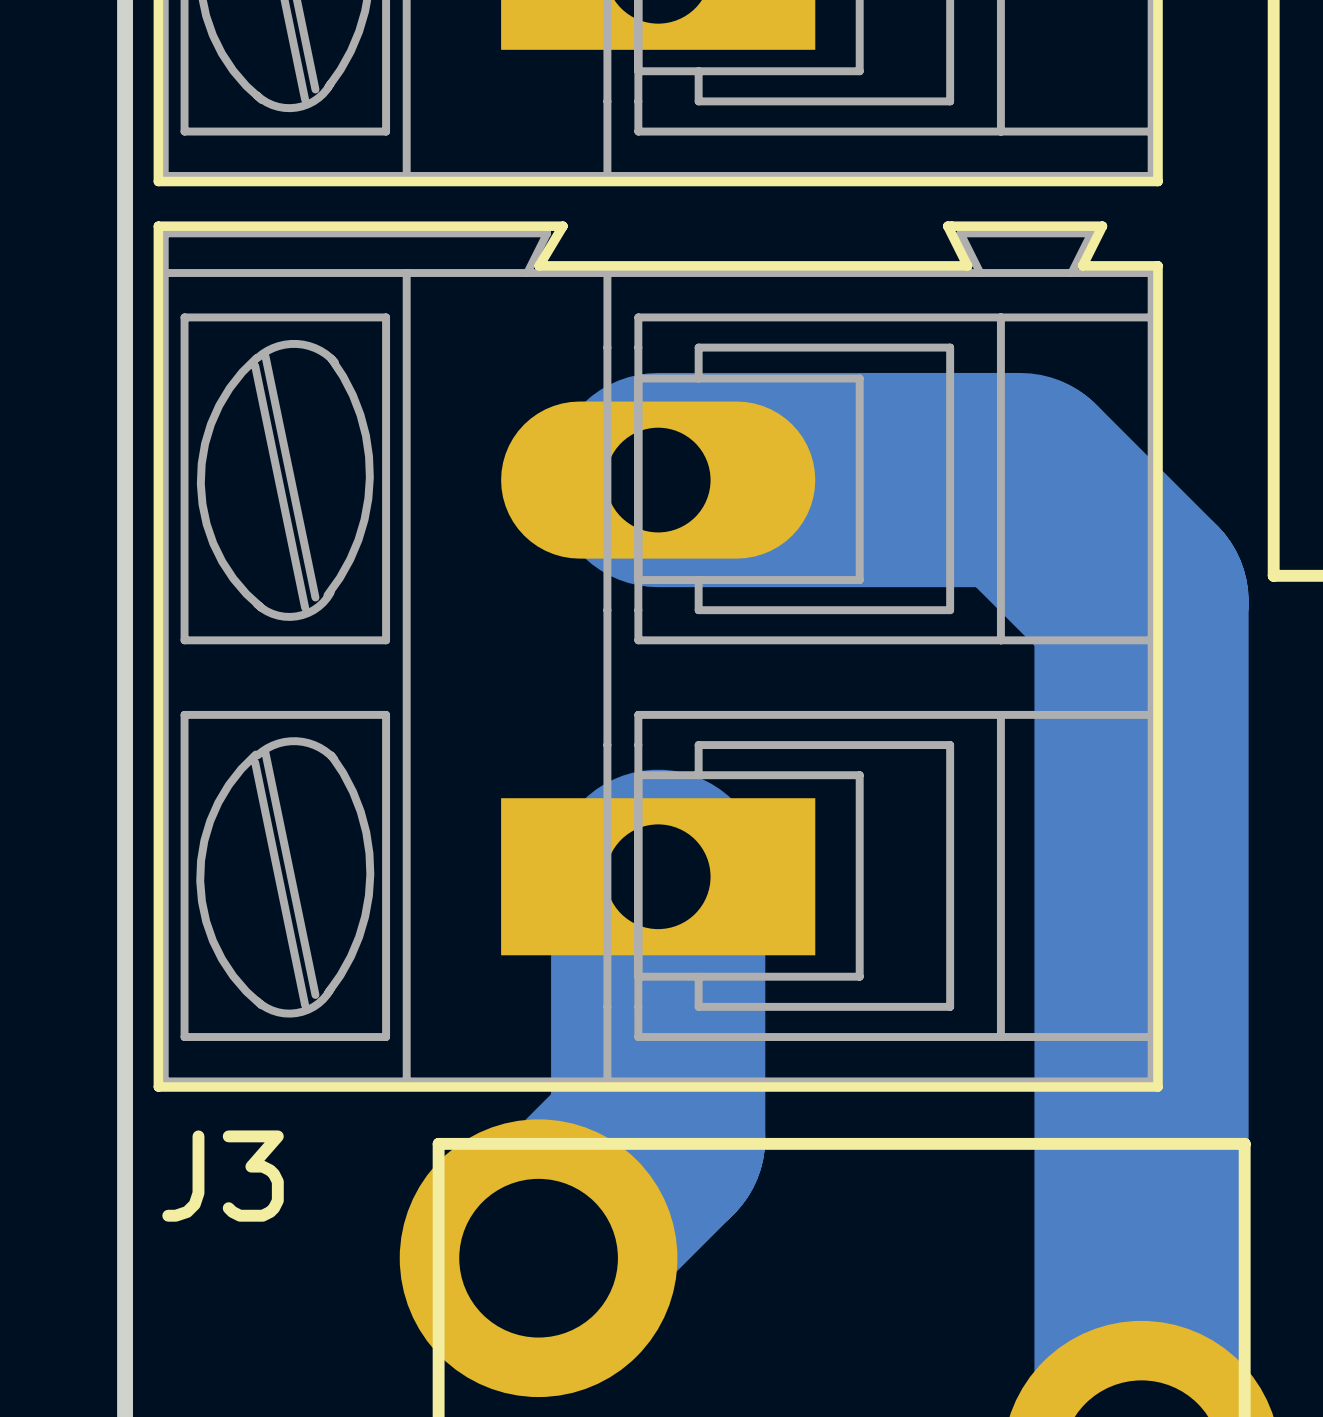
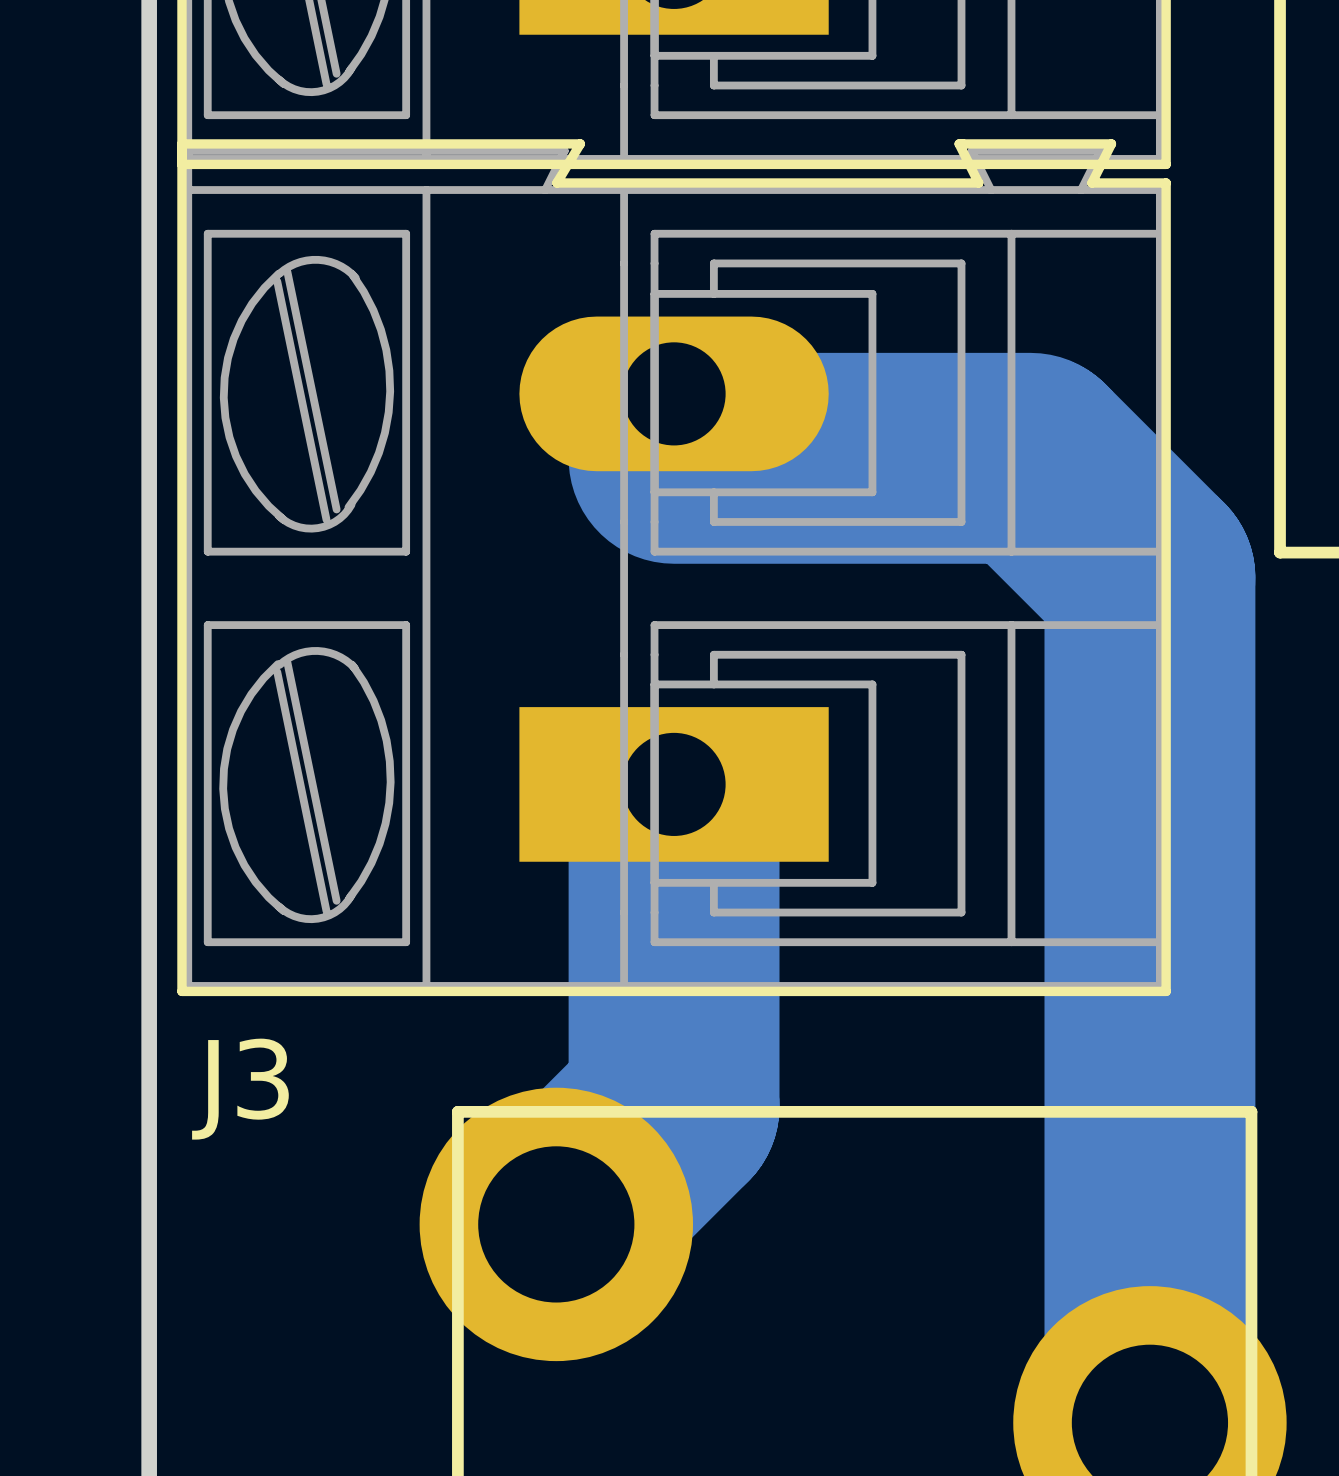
J3 position: (658, 656) -> (674, 567)

